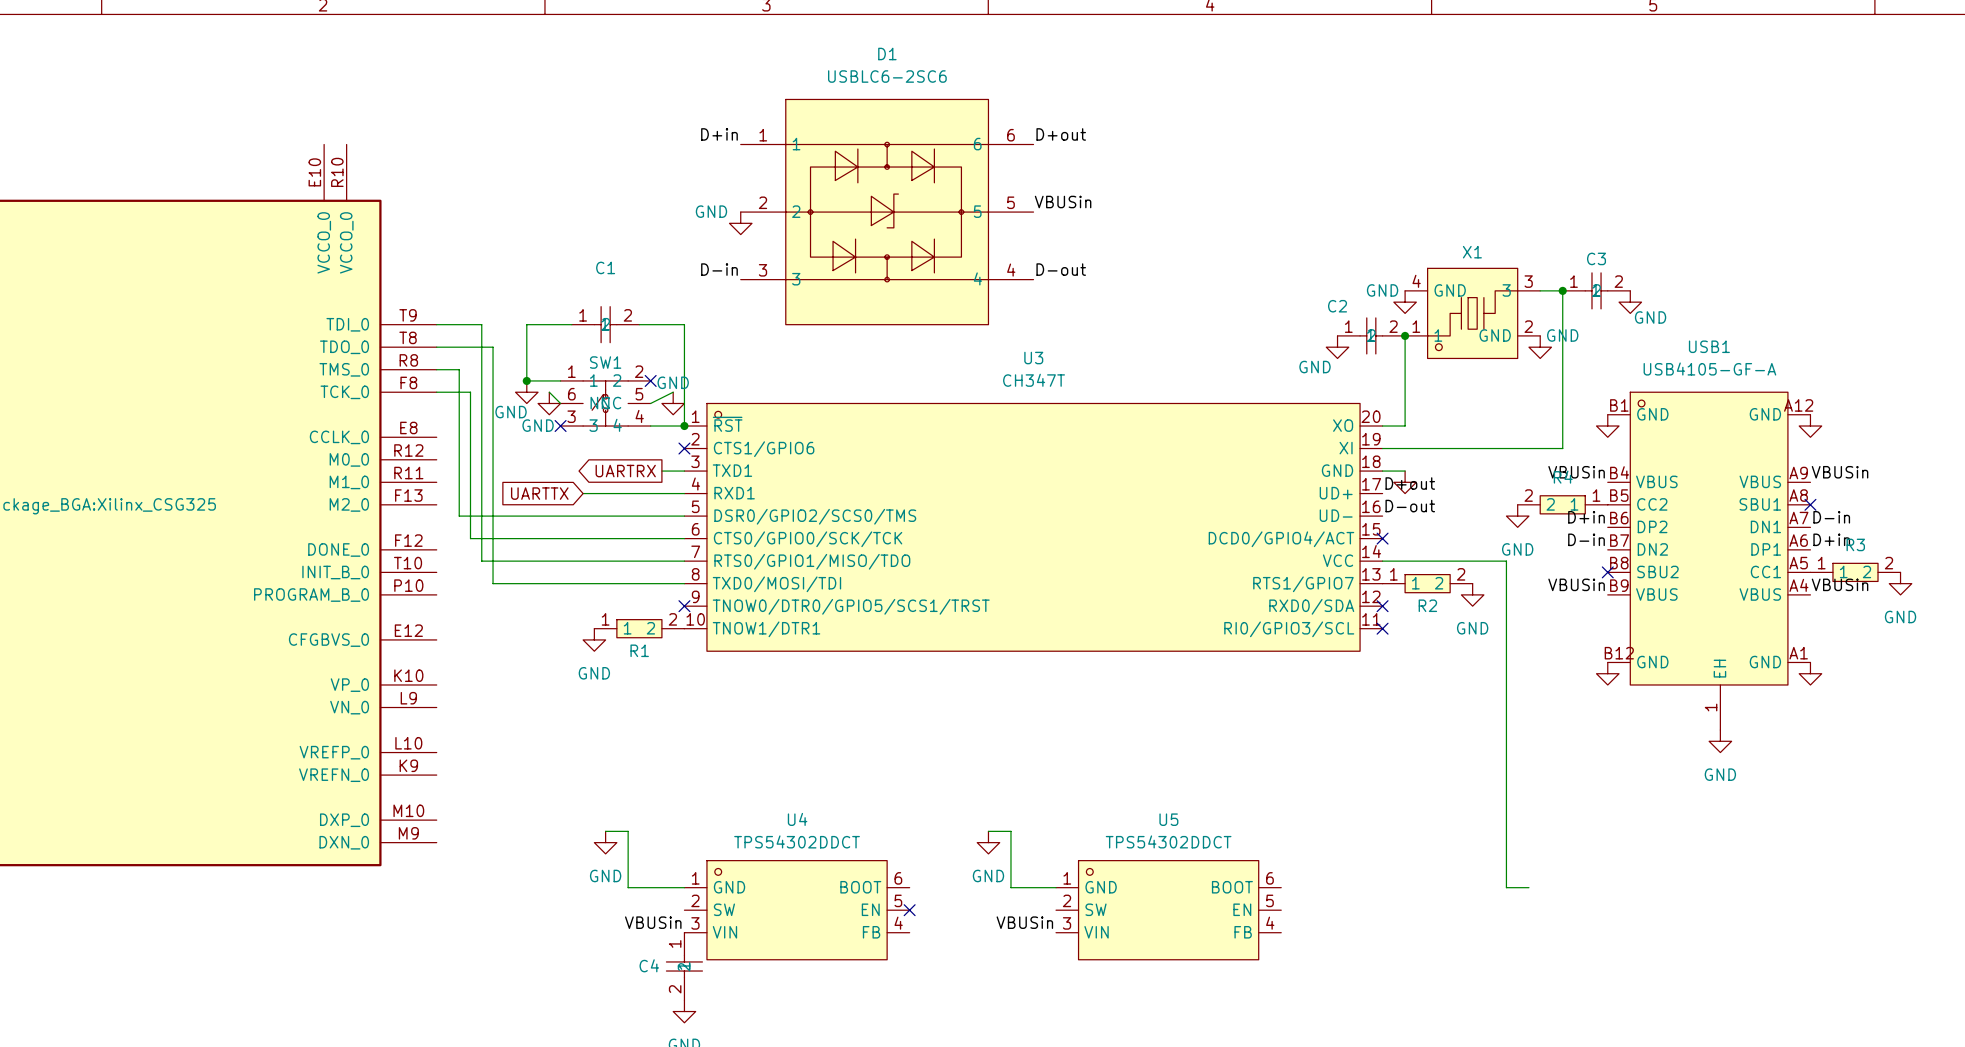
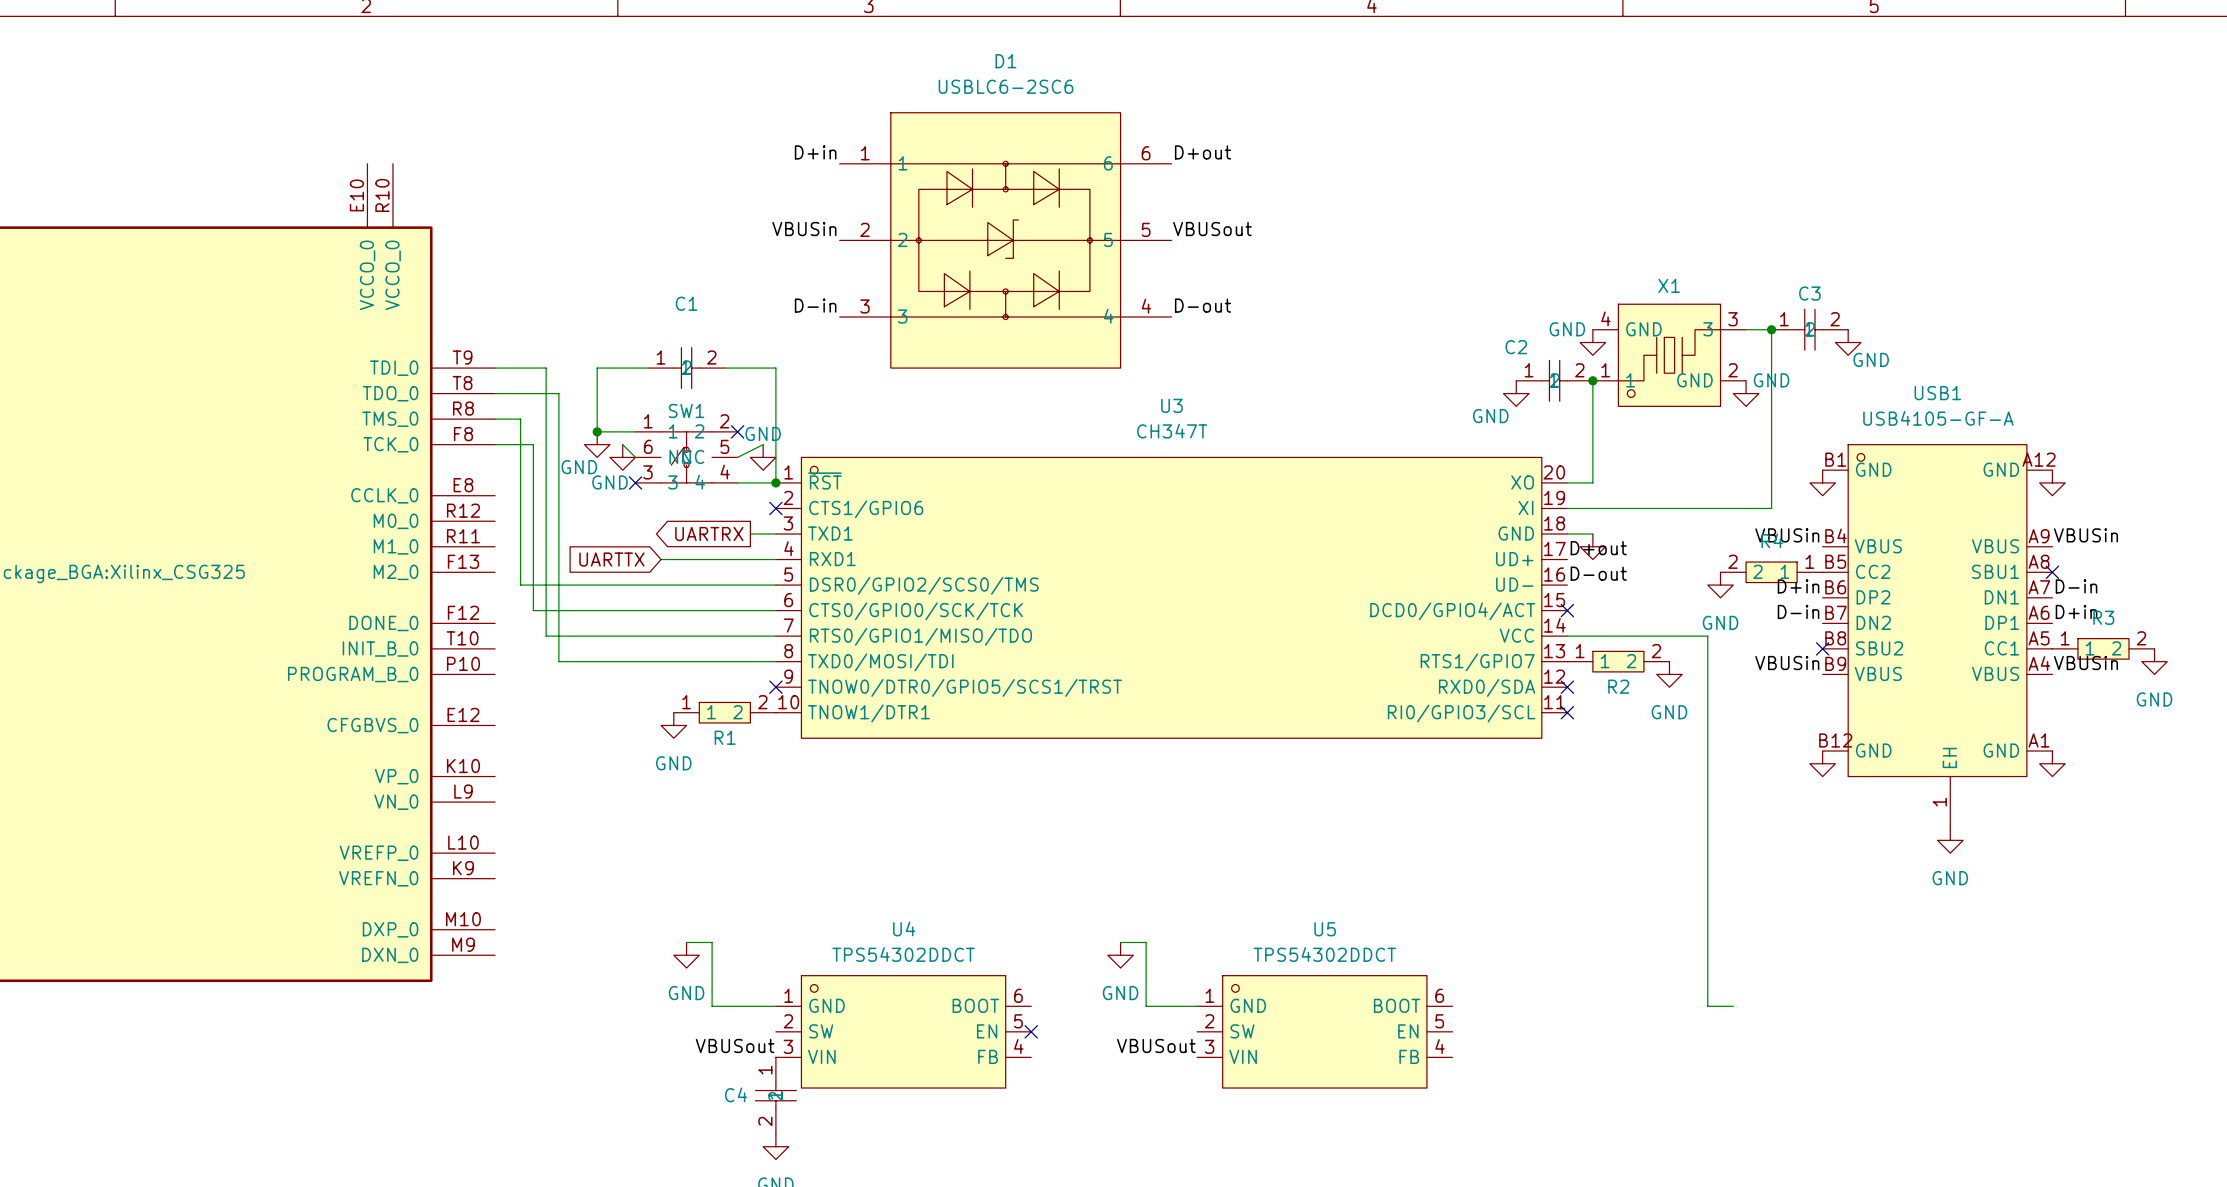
label: none -> VBUSin (804, 229)
label: VBUSin (1063, 202) -> VBUSout (1212, 229)
power symbol: GND (740, 223) -> none
label: VBUSin (653, 922) -> VBUSout (735, 1045)
label: VBUSin (1024, 922) -> VBUSout (1156, 1045)

